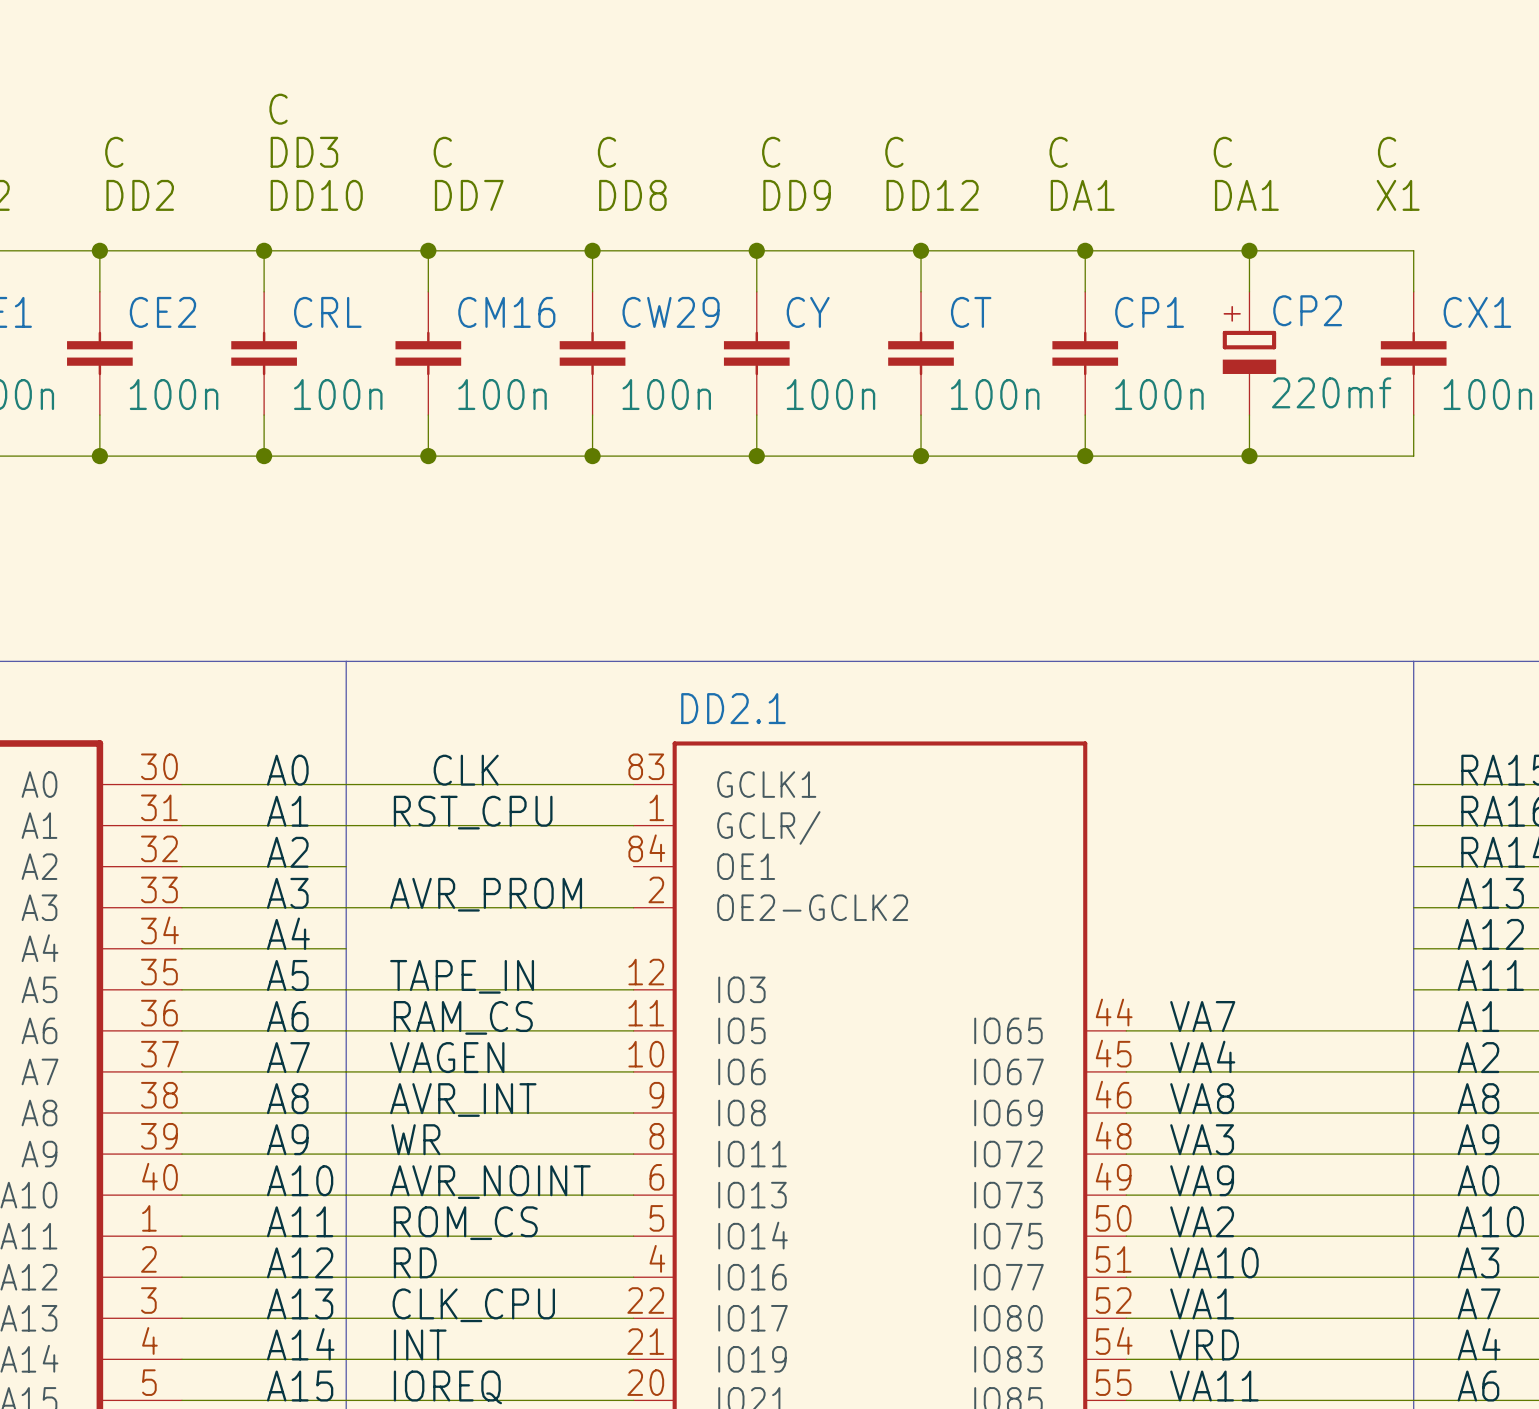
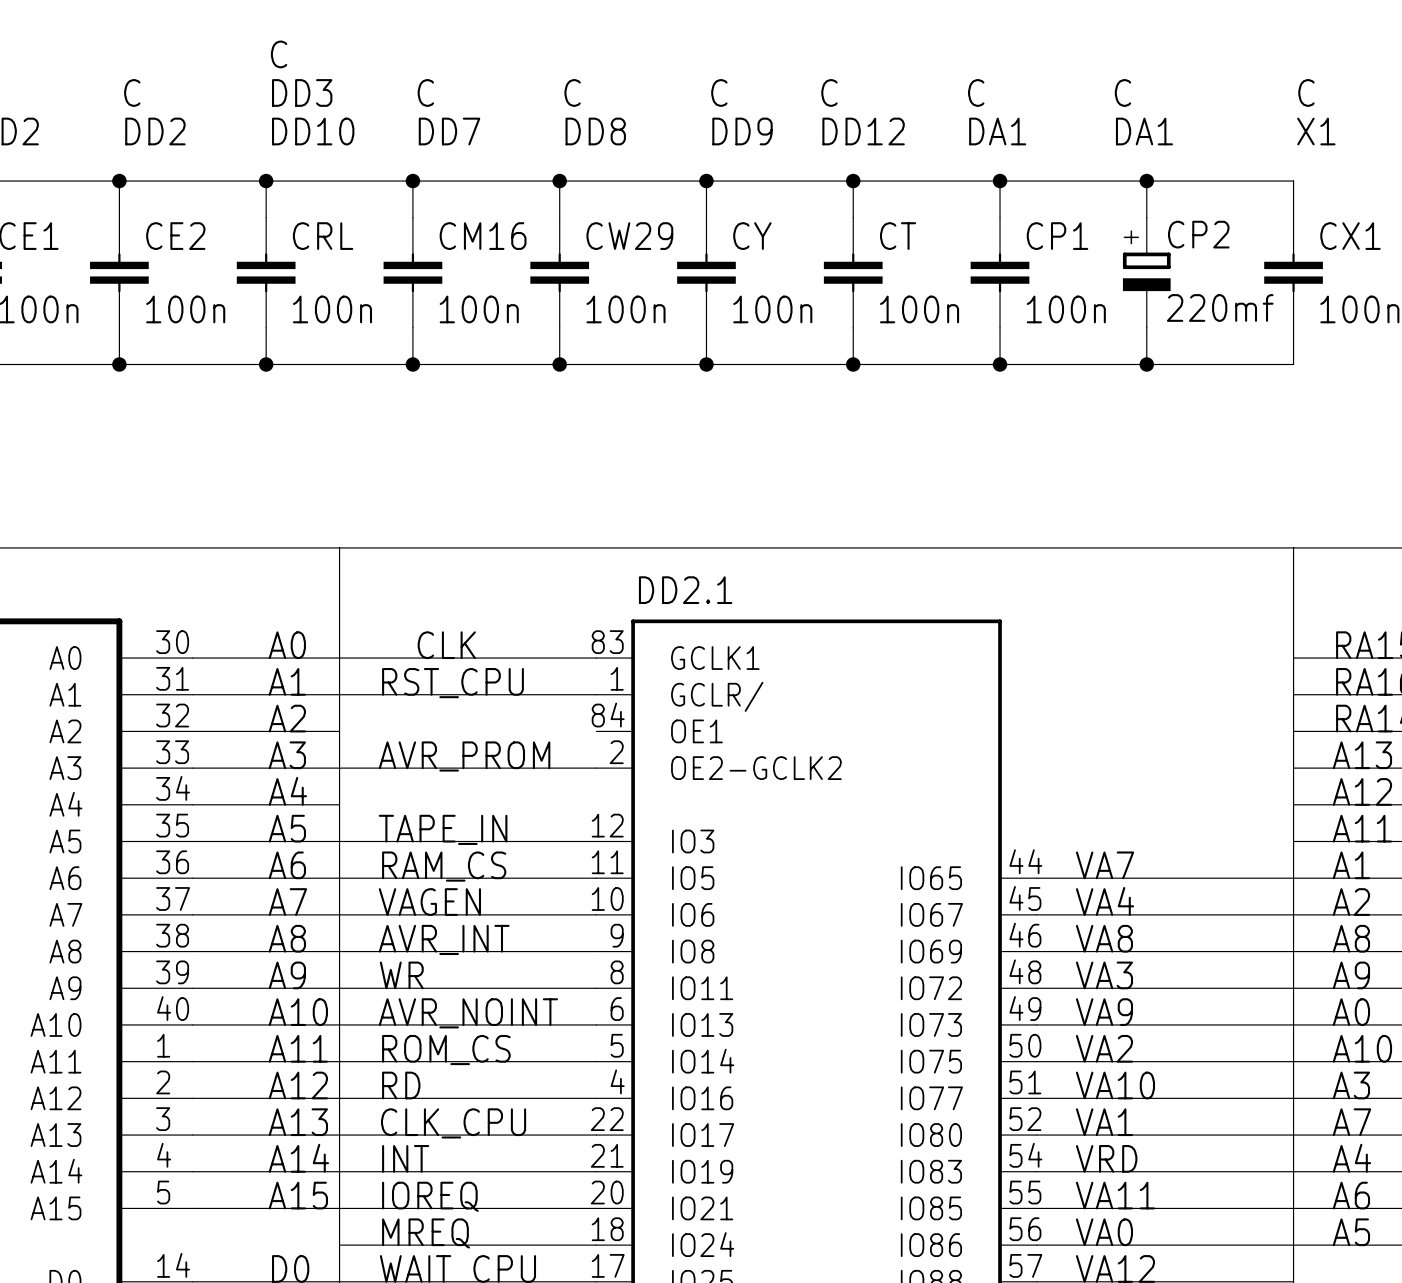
text position: C (1387, 152) -> C (1306, 92)
text position: X1 (1398, 195) -> X1 (1316, 131)

